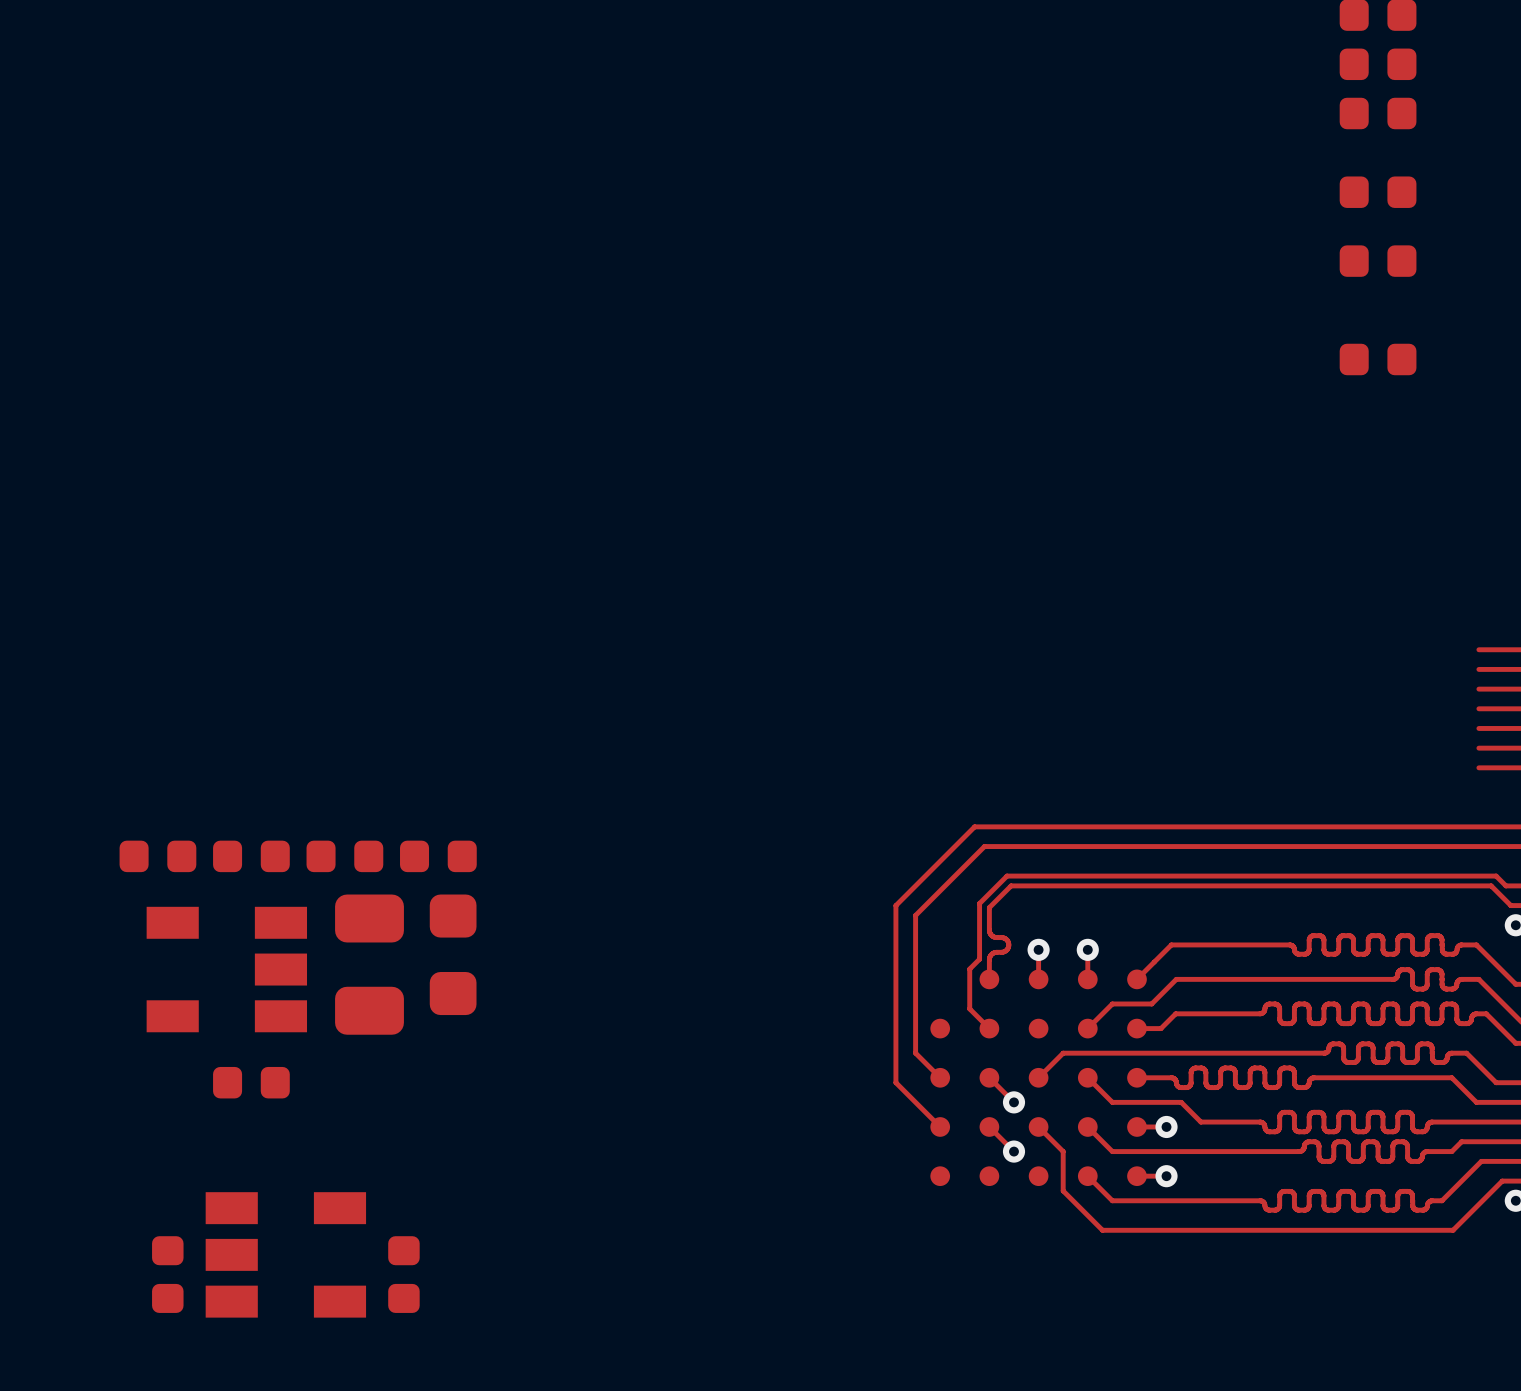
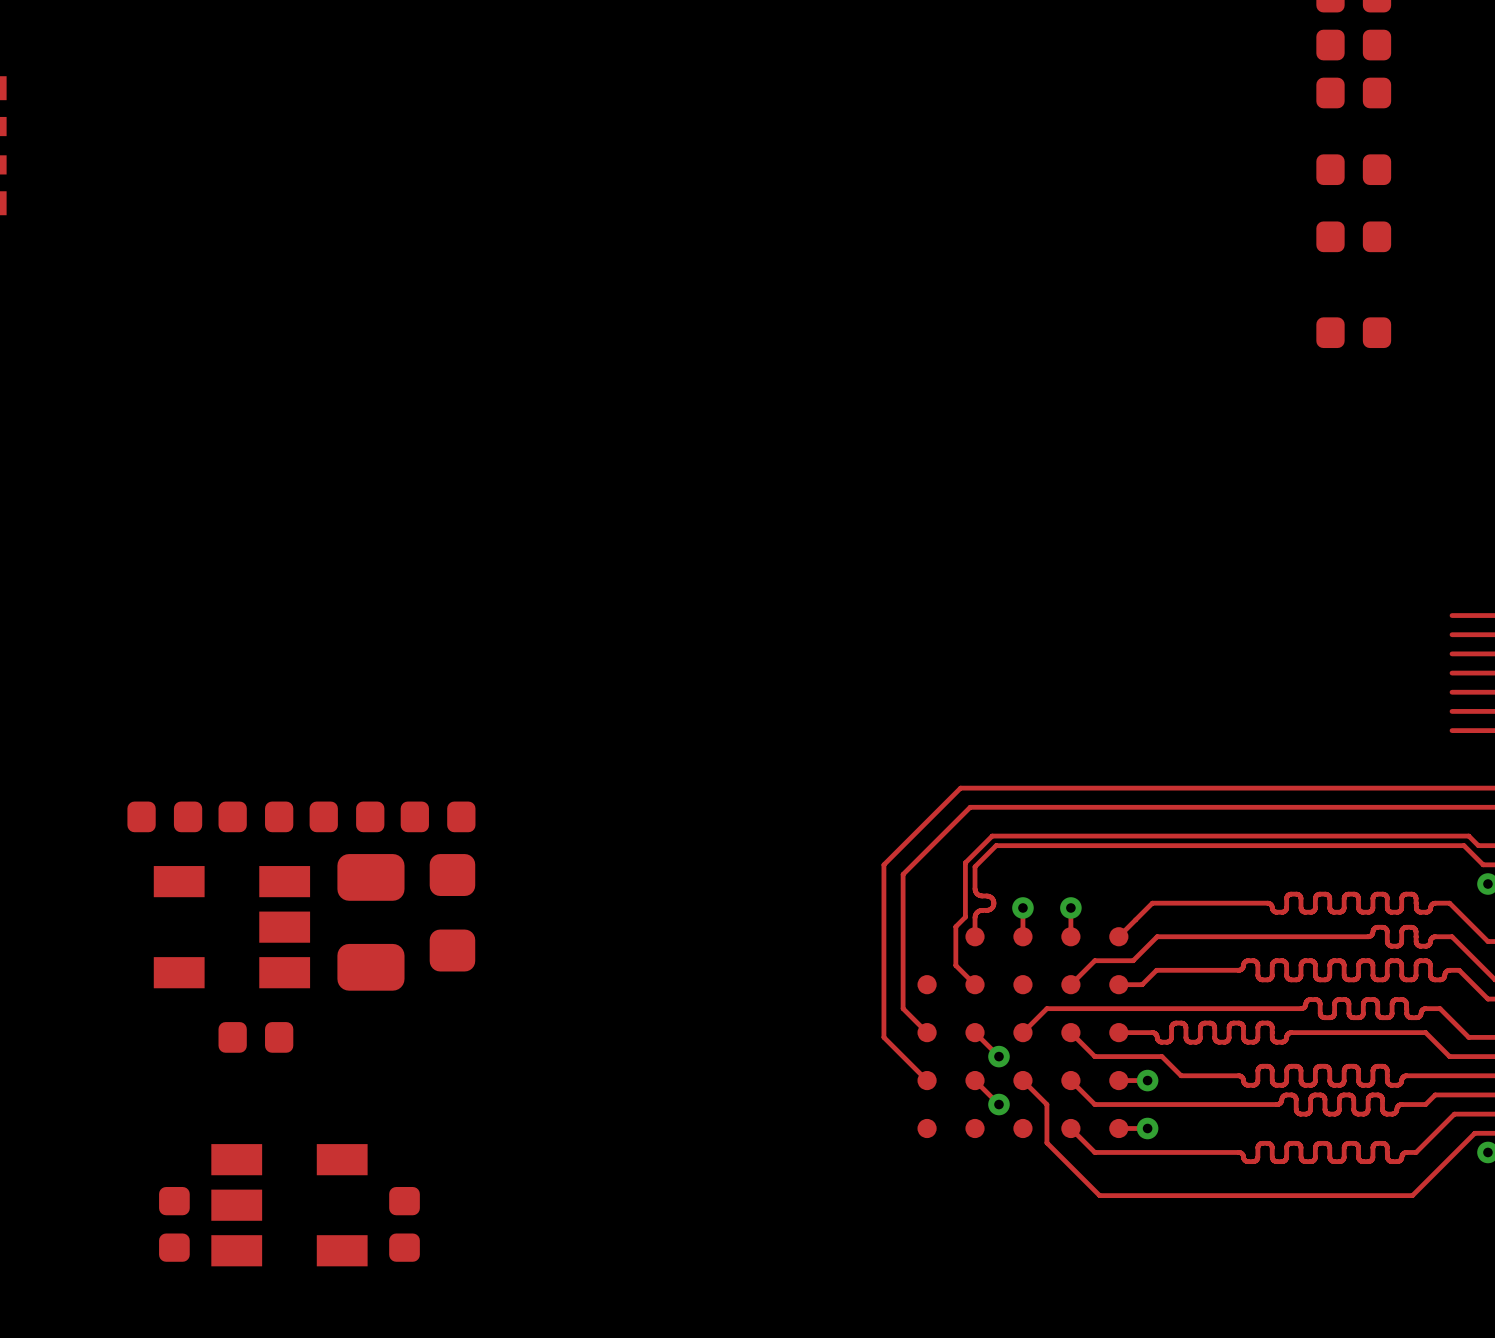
top track: (1453, 1230) (1102, 1230) -> (1426, 1181) (1412, 1195) (1099, 1195) (1085, 1181)

